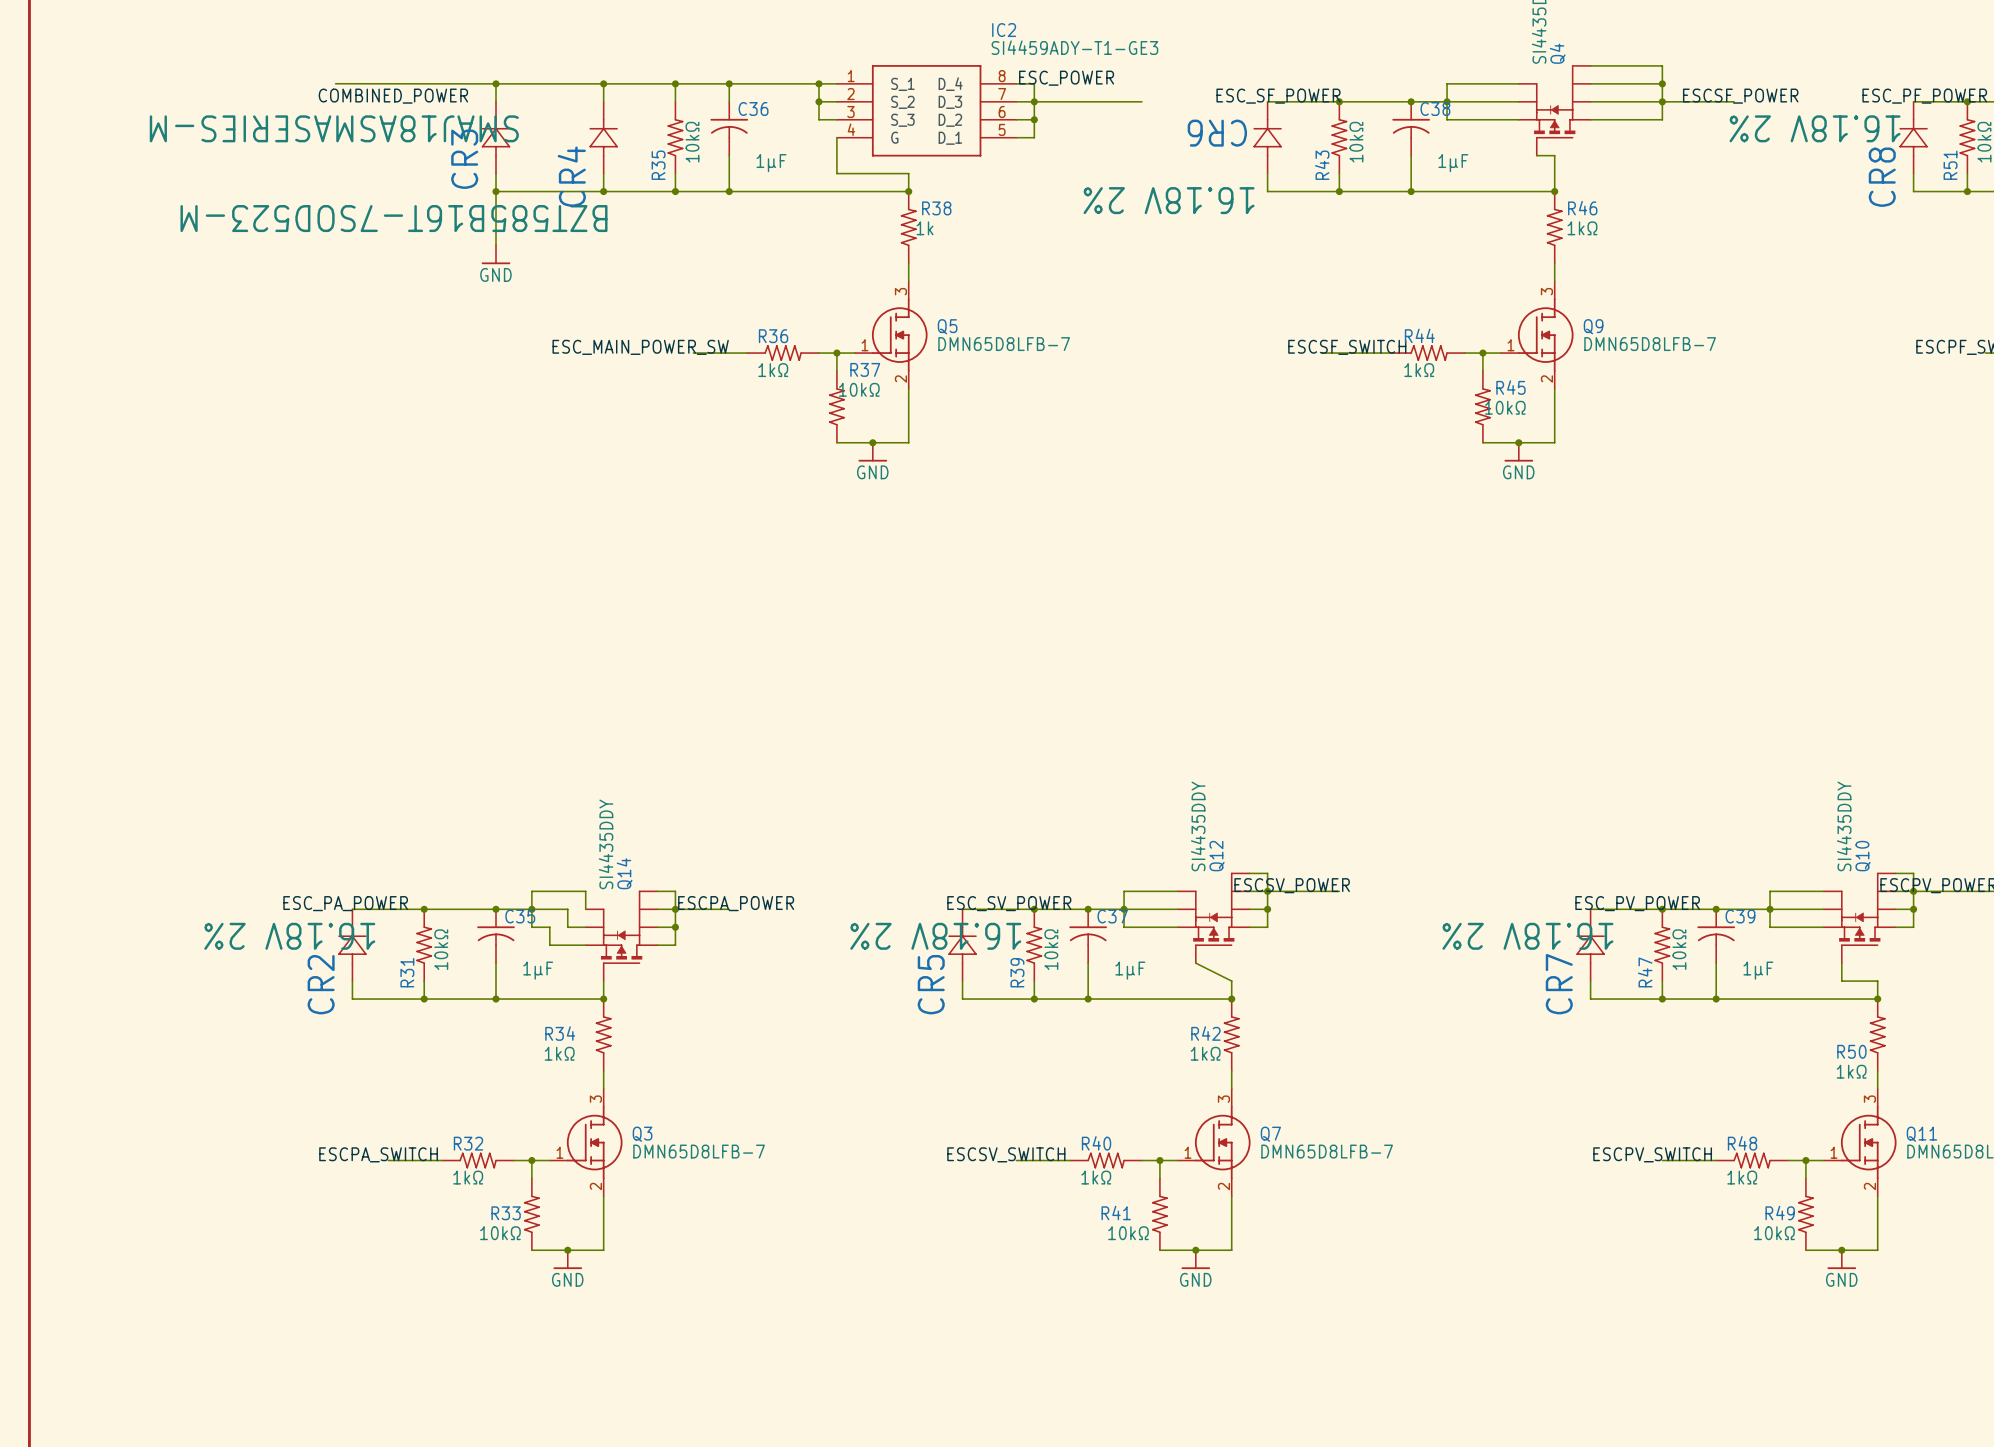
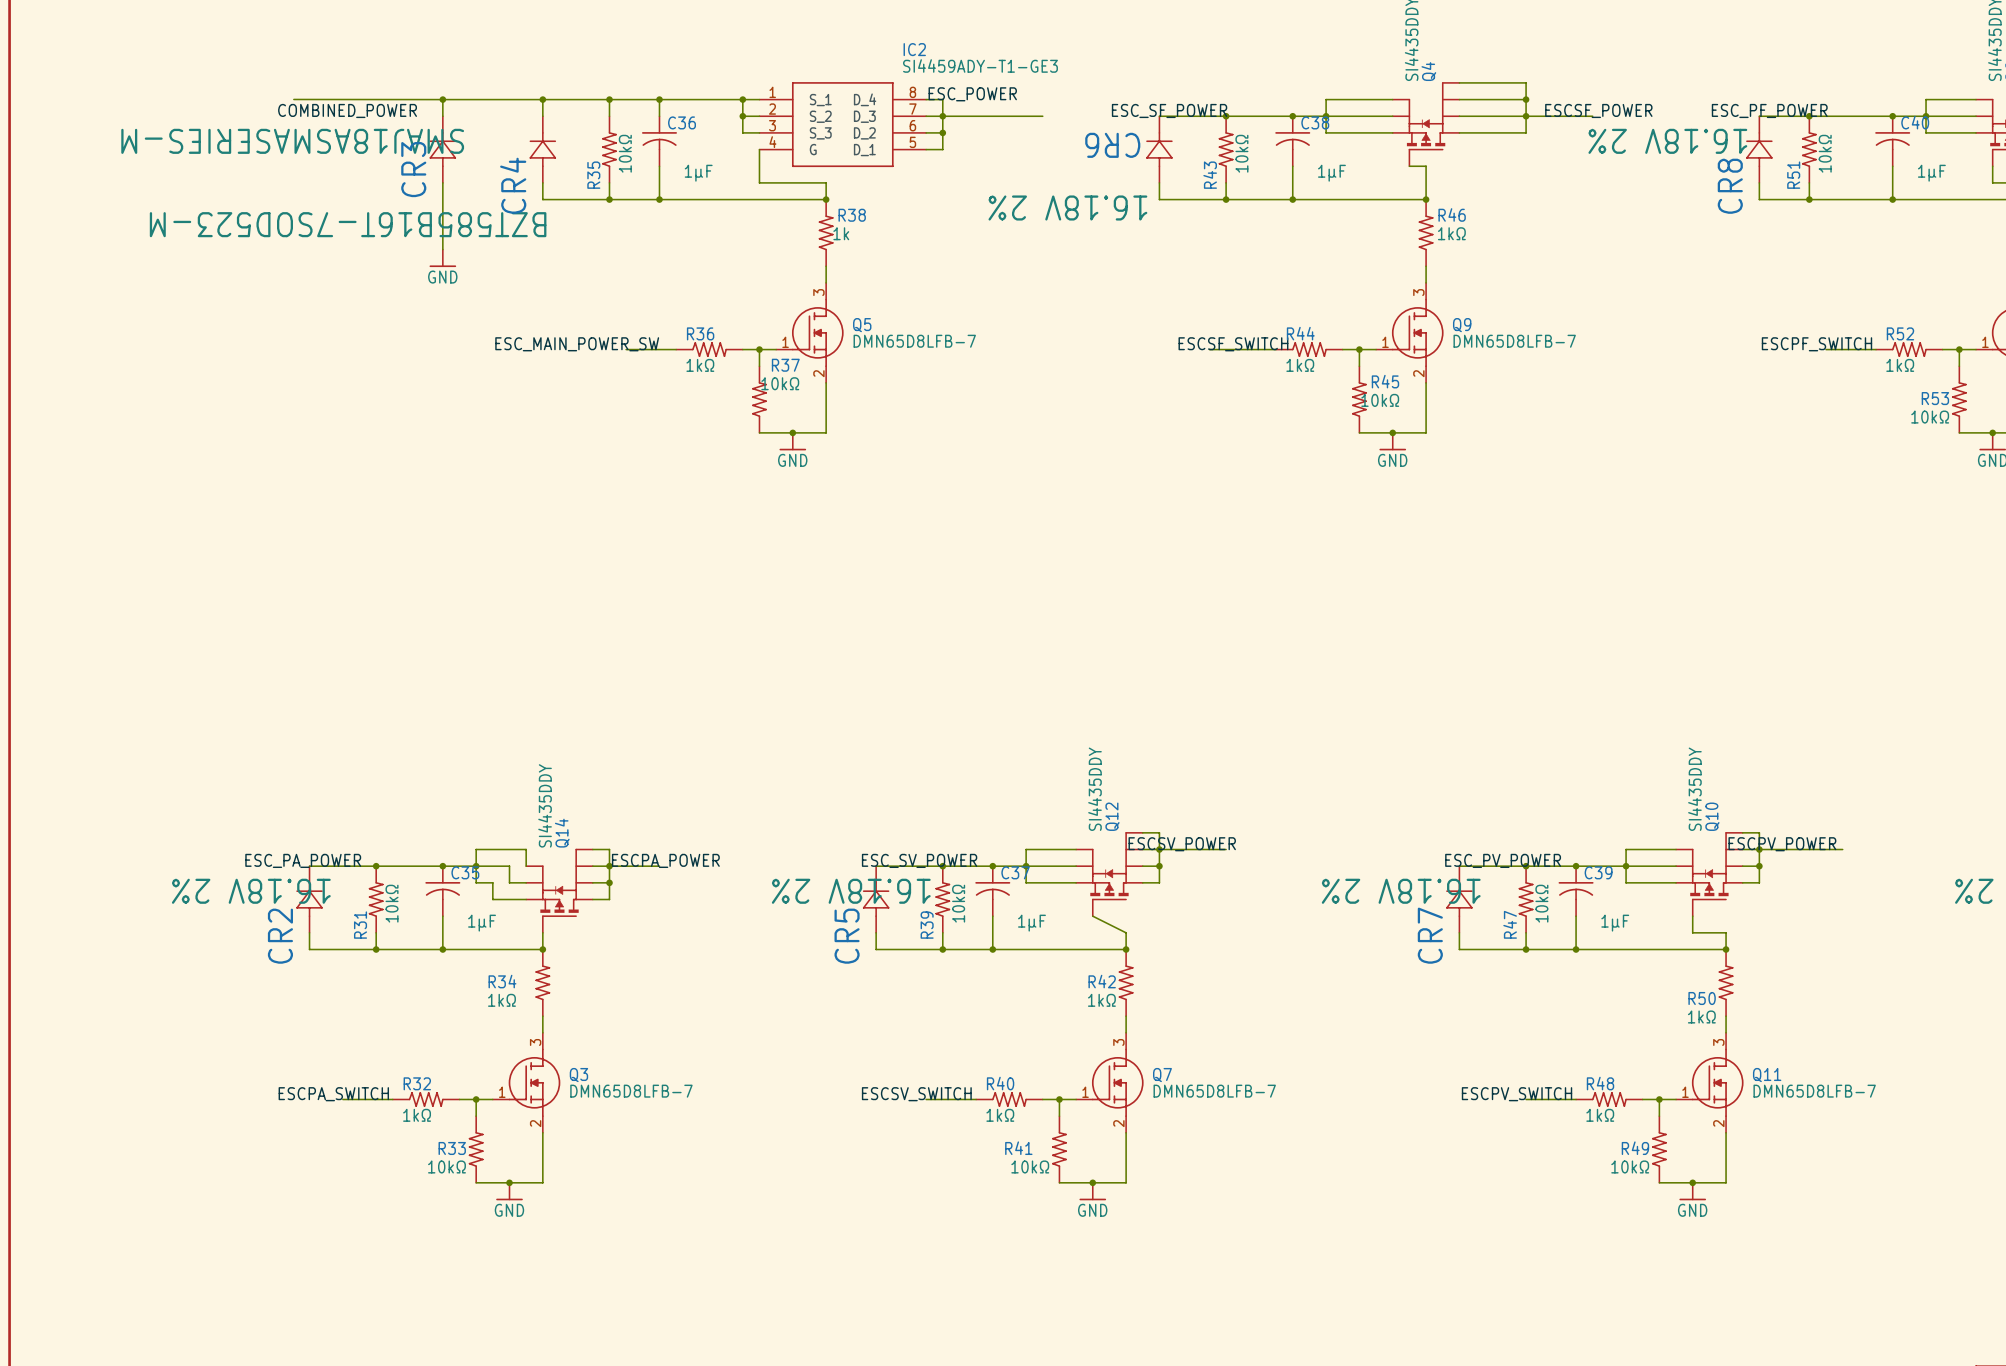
wire: (496, 191) (603, 191) -> none
junction: (496, 191) -> none
junction: (603, 191) -> none

